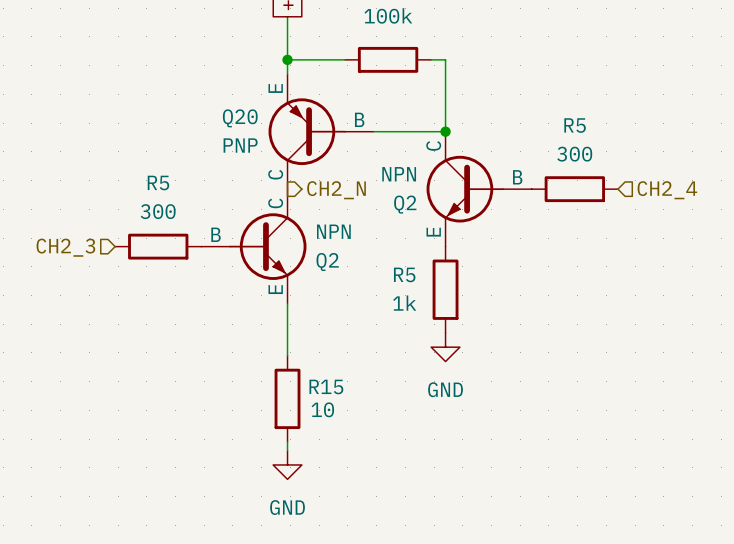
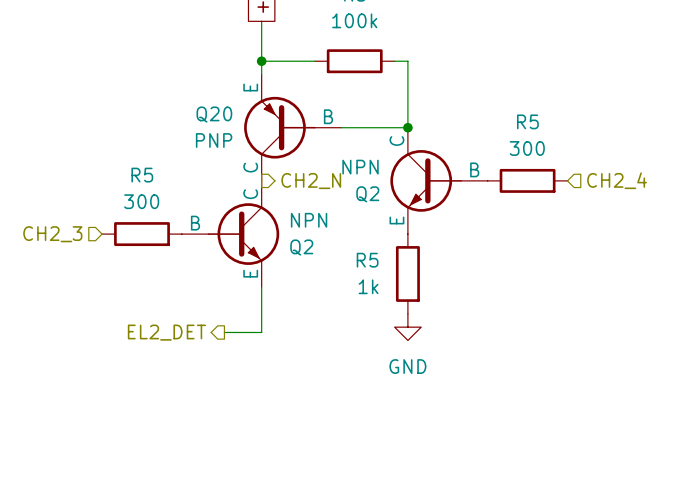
wire: (287, 352) (287, 355) -> (261, 332) (224, 332)
hierarchical label: none -> EL2_DET (166, 332)
R15: 10 (287, 398) -> none
wire: (287, 441) (287, 450) -> none
power symbol: GND (287, 464) -> none

